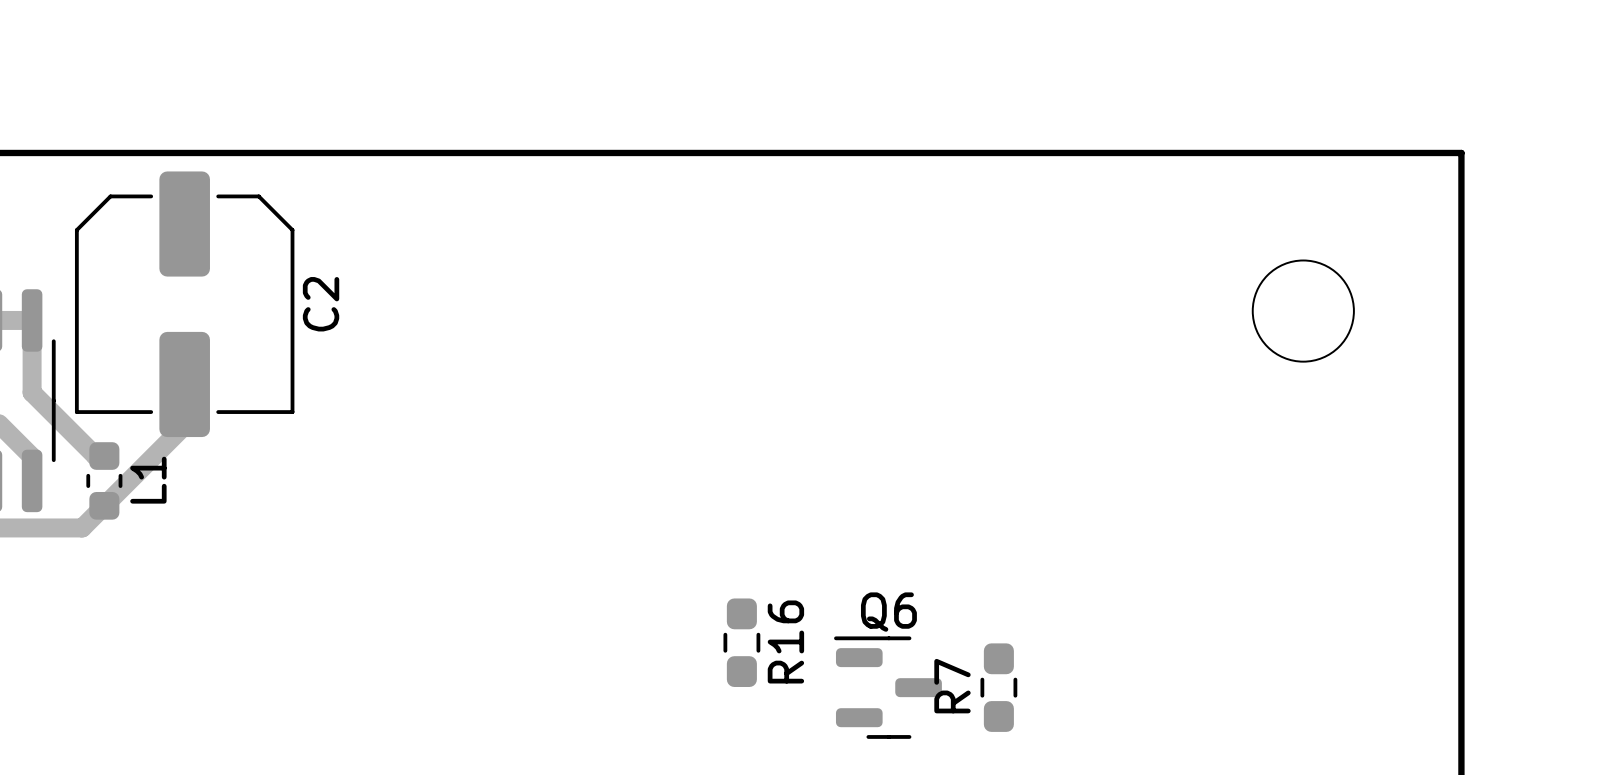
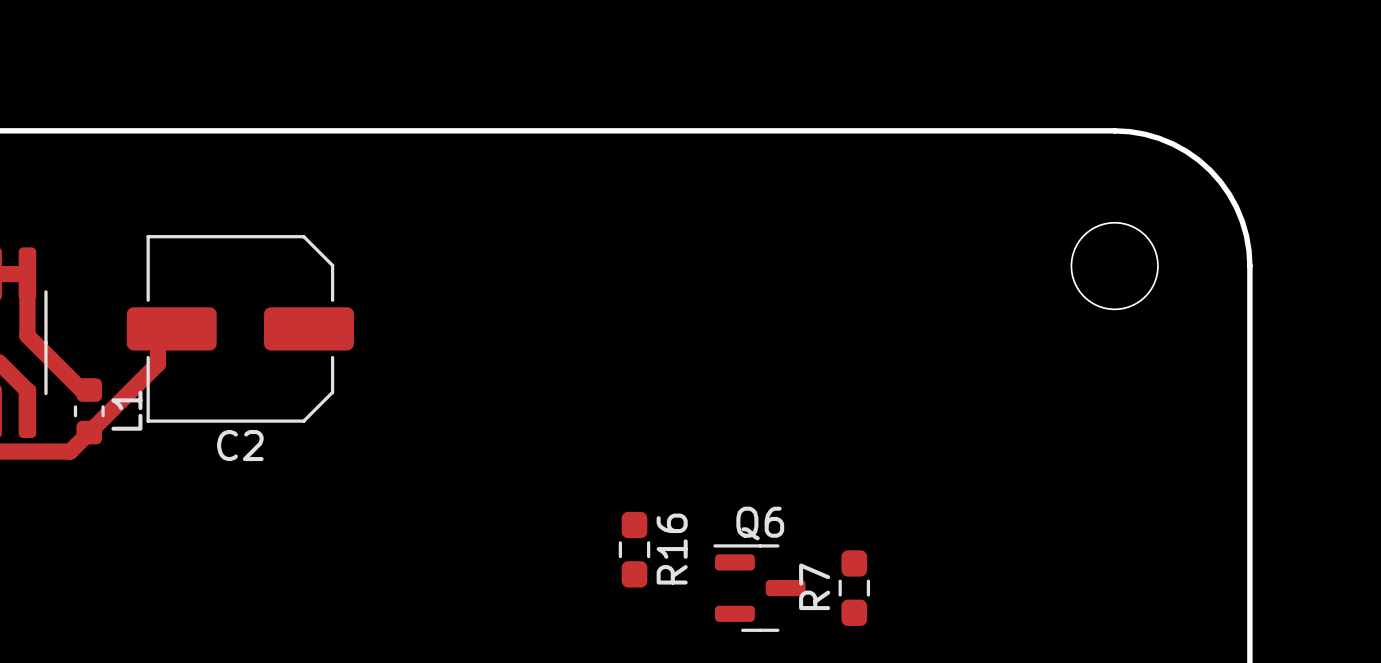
board edge: (1303, 152) (1461, 152) (1461, 311) -> (1114, 130) (1129, 131) (1159, 138) (1186, 151) (1210, 170) (1229, 194) (1236, 207) (1246, 235) (1249, 266)
C2 rotation: 0° (184, 304) -> 90° clockwise (240, 328)

